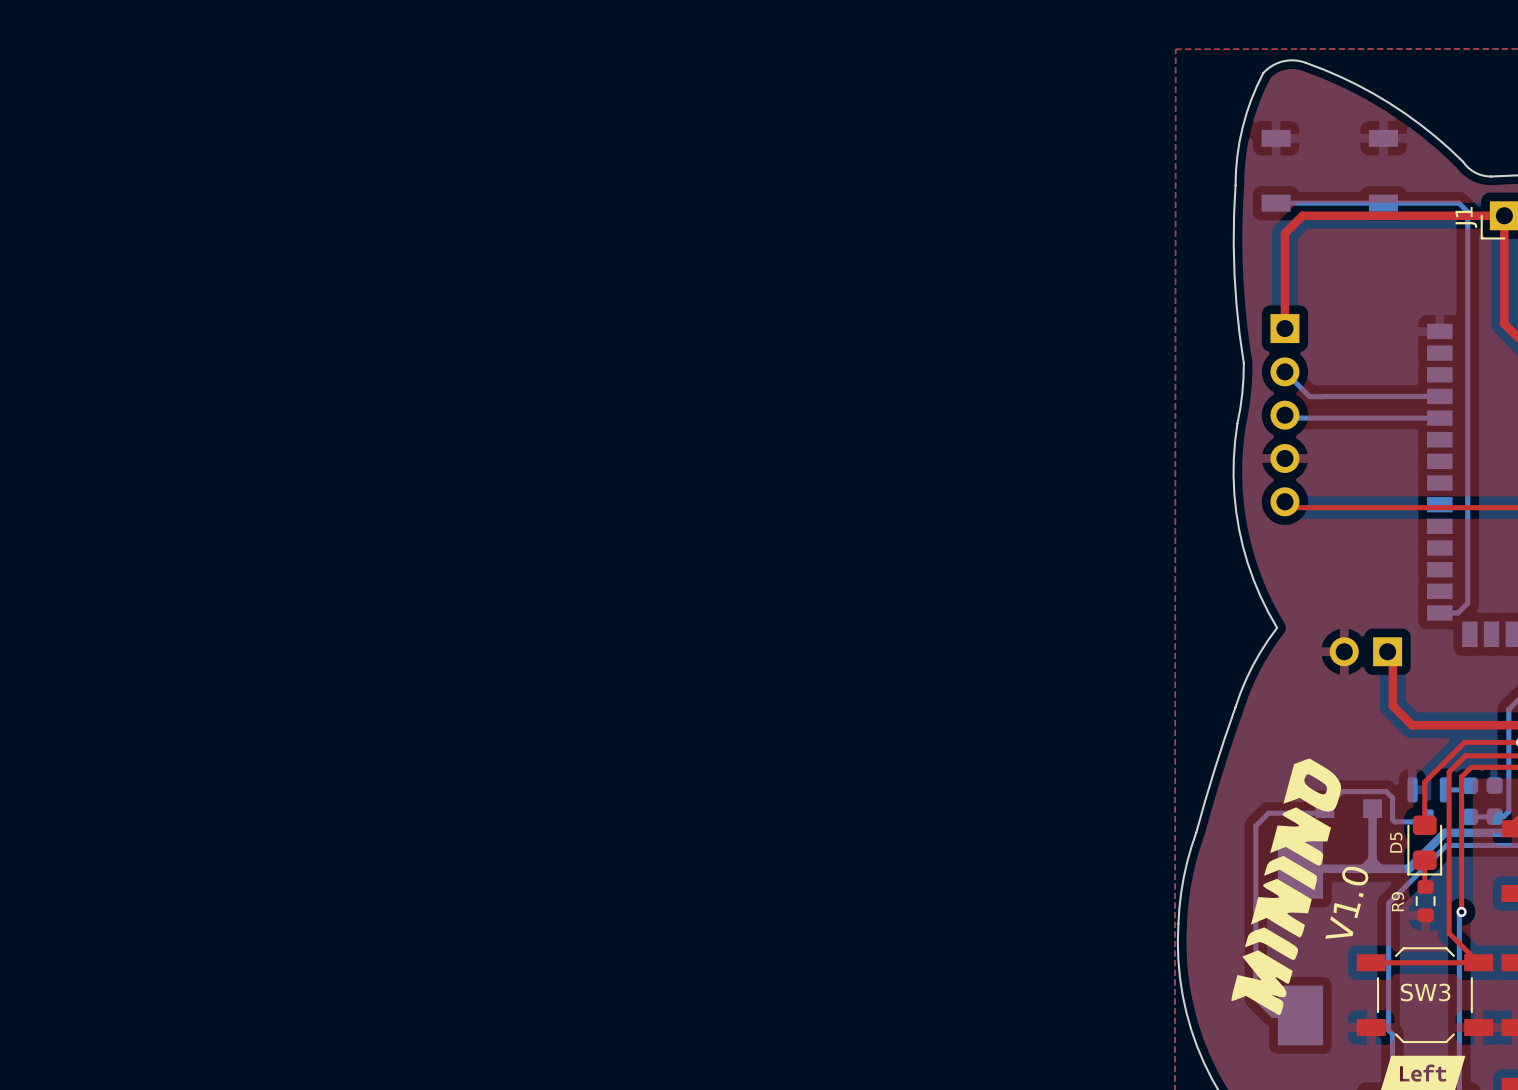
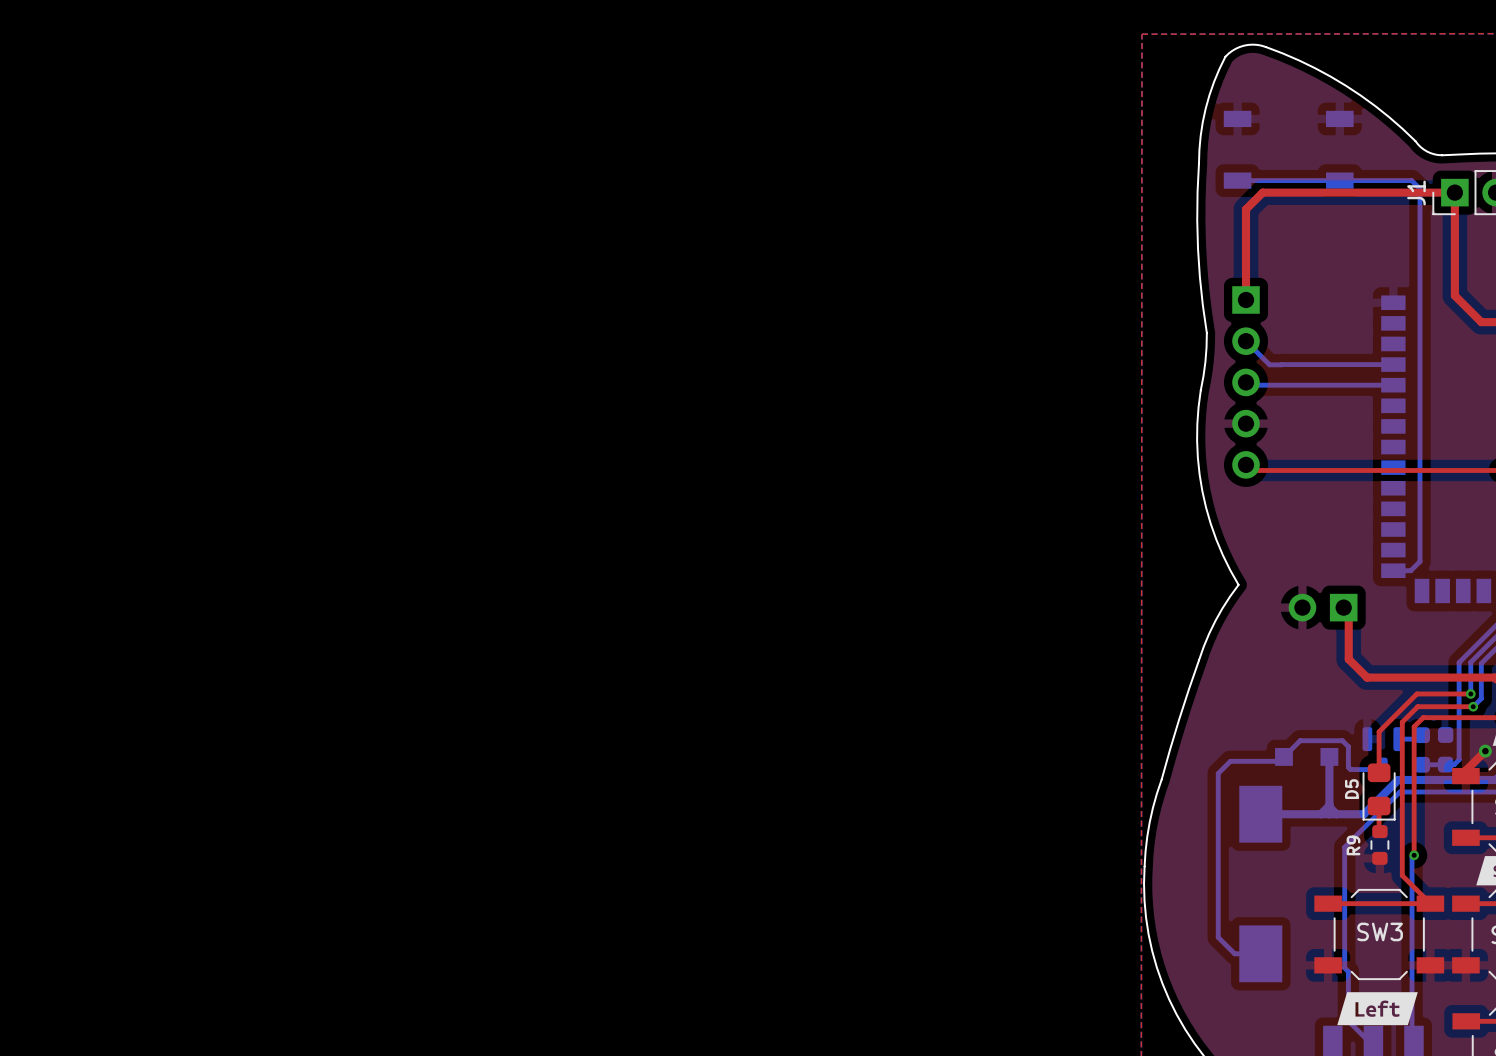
drawing: [1231, 758, 1342, 1016] -> none
text: V1.0 (1347, 902) -> none

